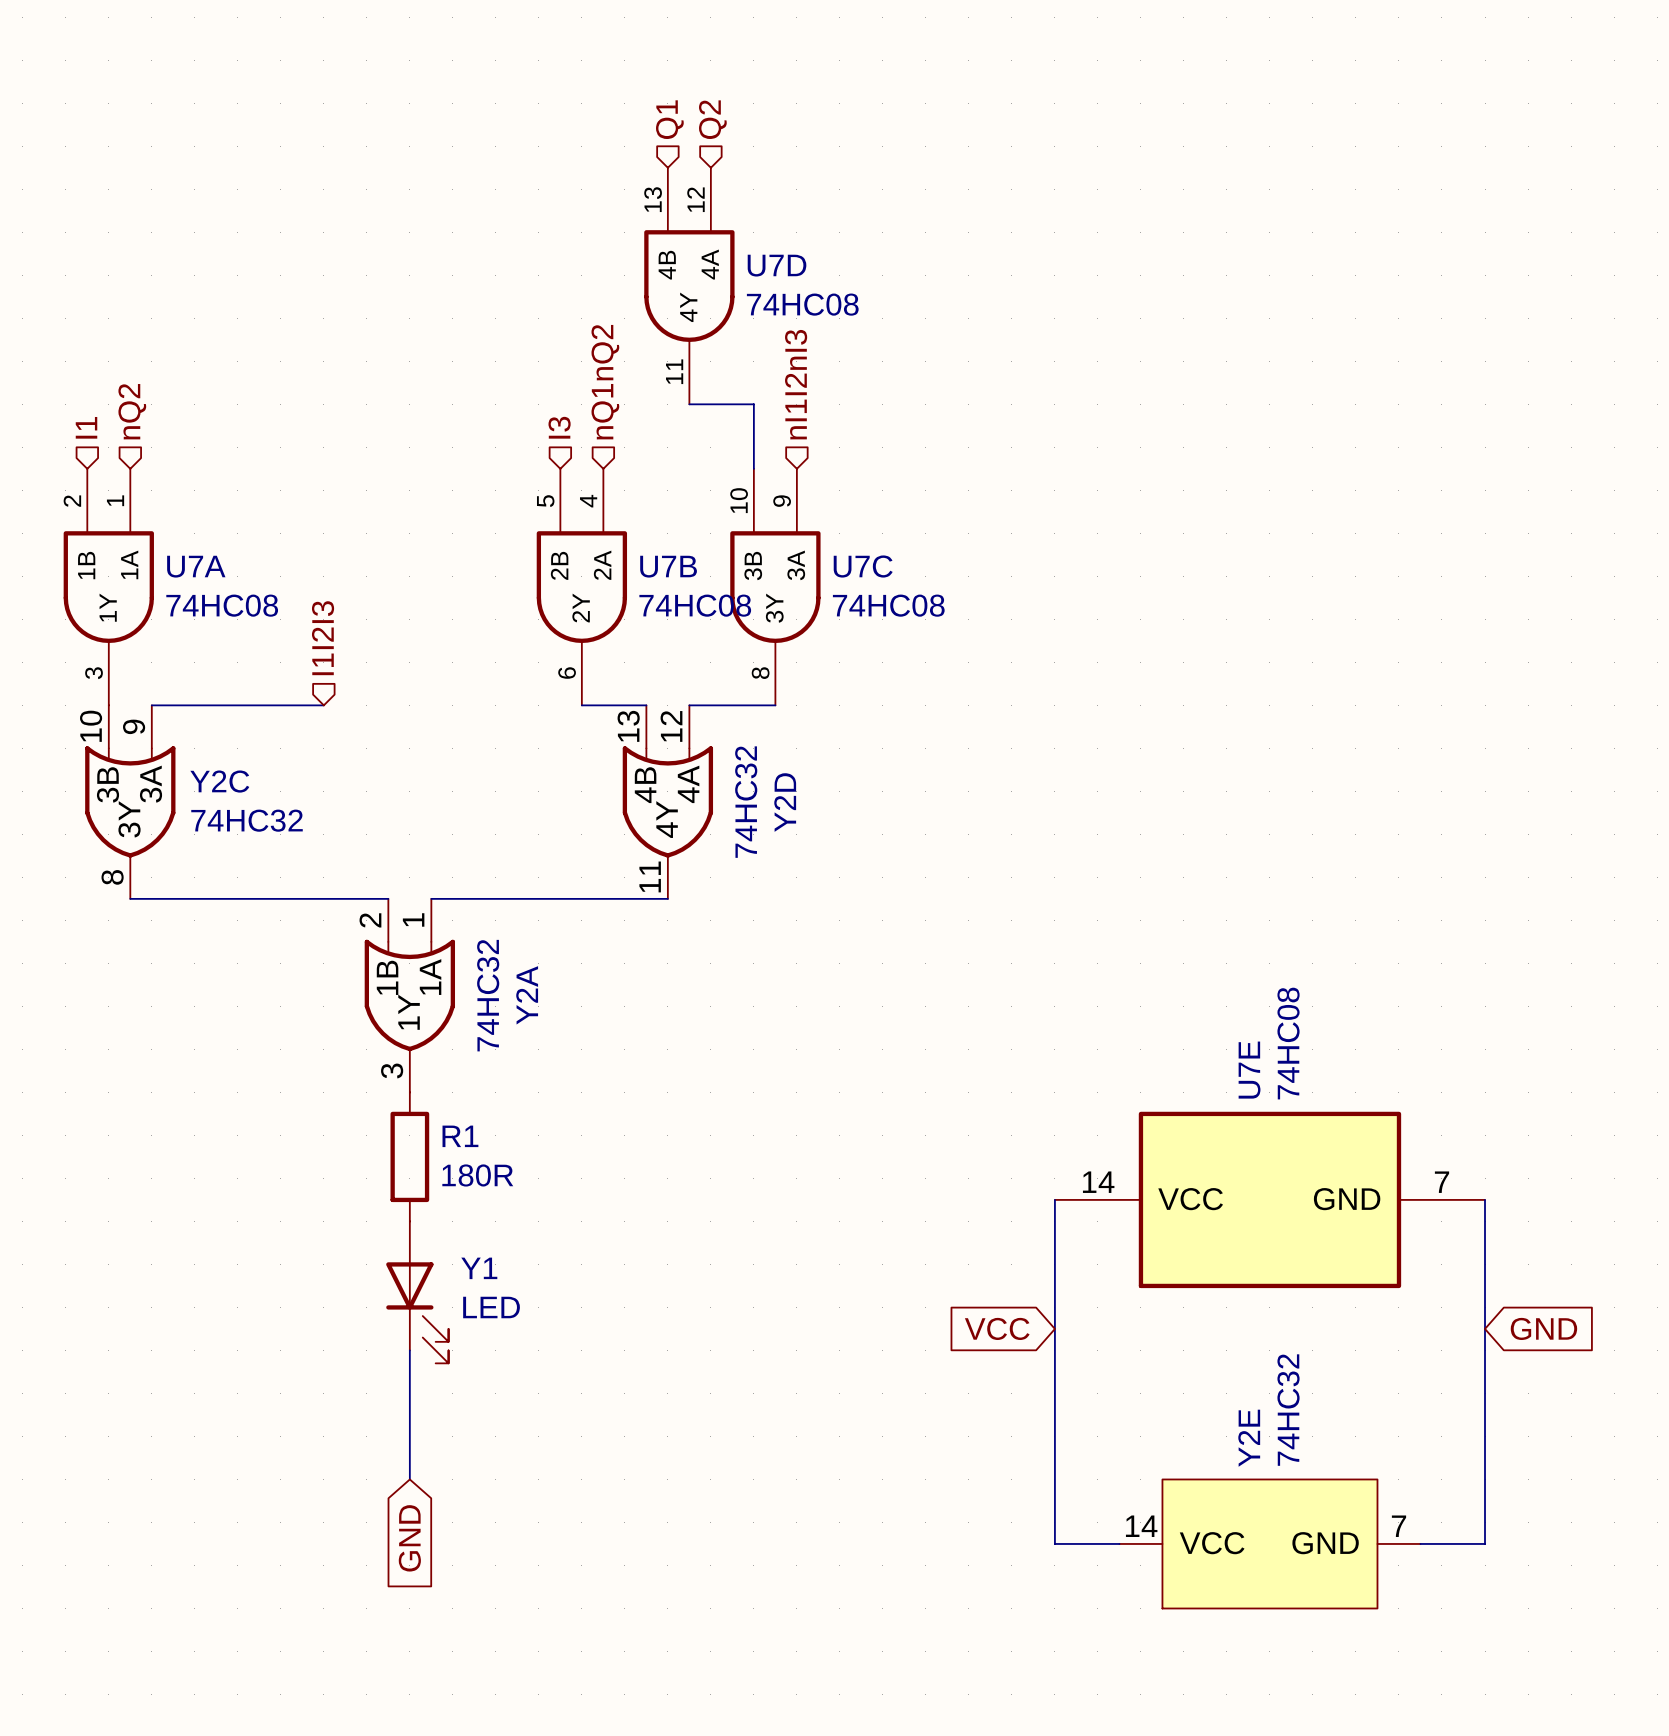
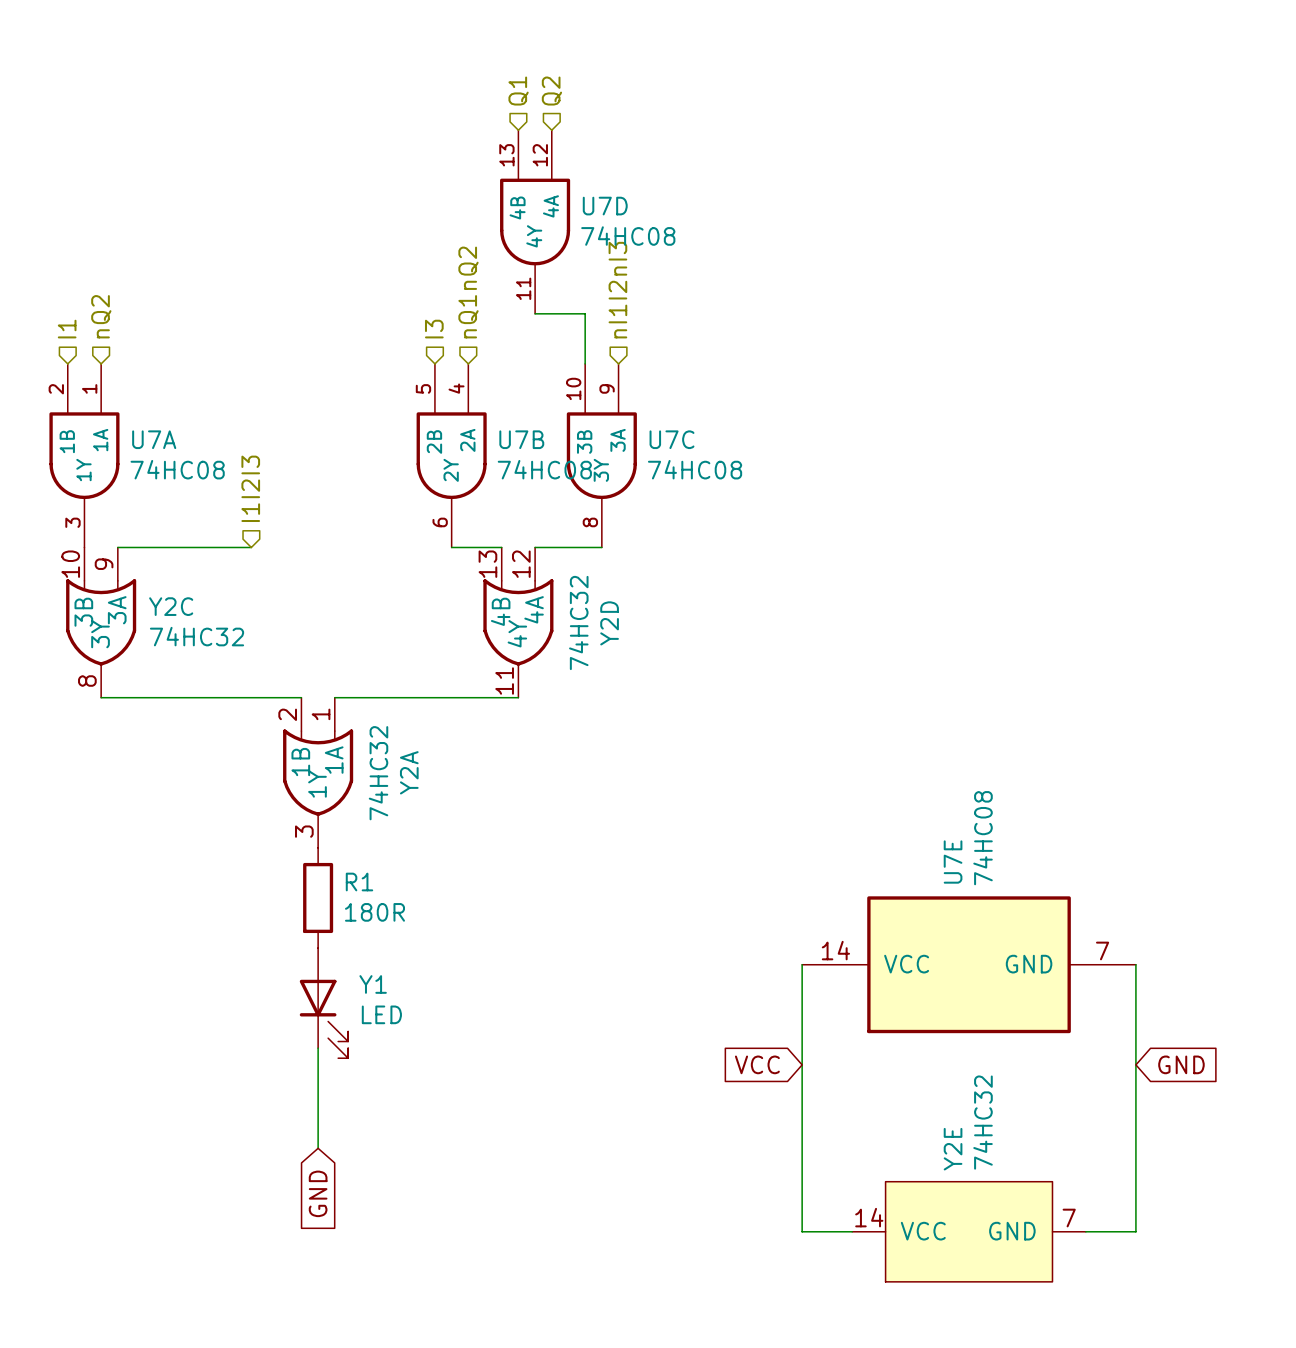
wire: (1054, 1199) (1054, 1543) (1119, 1543) -> (802, 964) (802, 1231) (852, 1231)
U7E position: (1269, 1199) -> (969, 964)
wire: (1485, 1199) (1485, 1543) (1420, 1543) -> (1135, 964) (1135, 1231) (1085, 1231)
global label position: VCC (997, 1328) -> VCC (757, 1064)
global label position: GND (1543, 1328) -> GND (1181, 1064)
Y2E position: (1269, 1543) -> (969, 1231)

